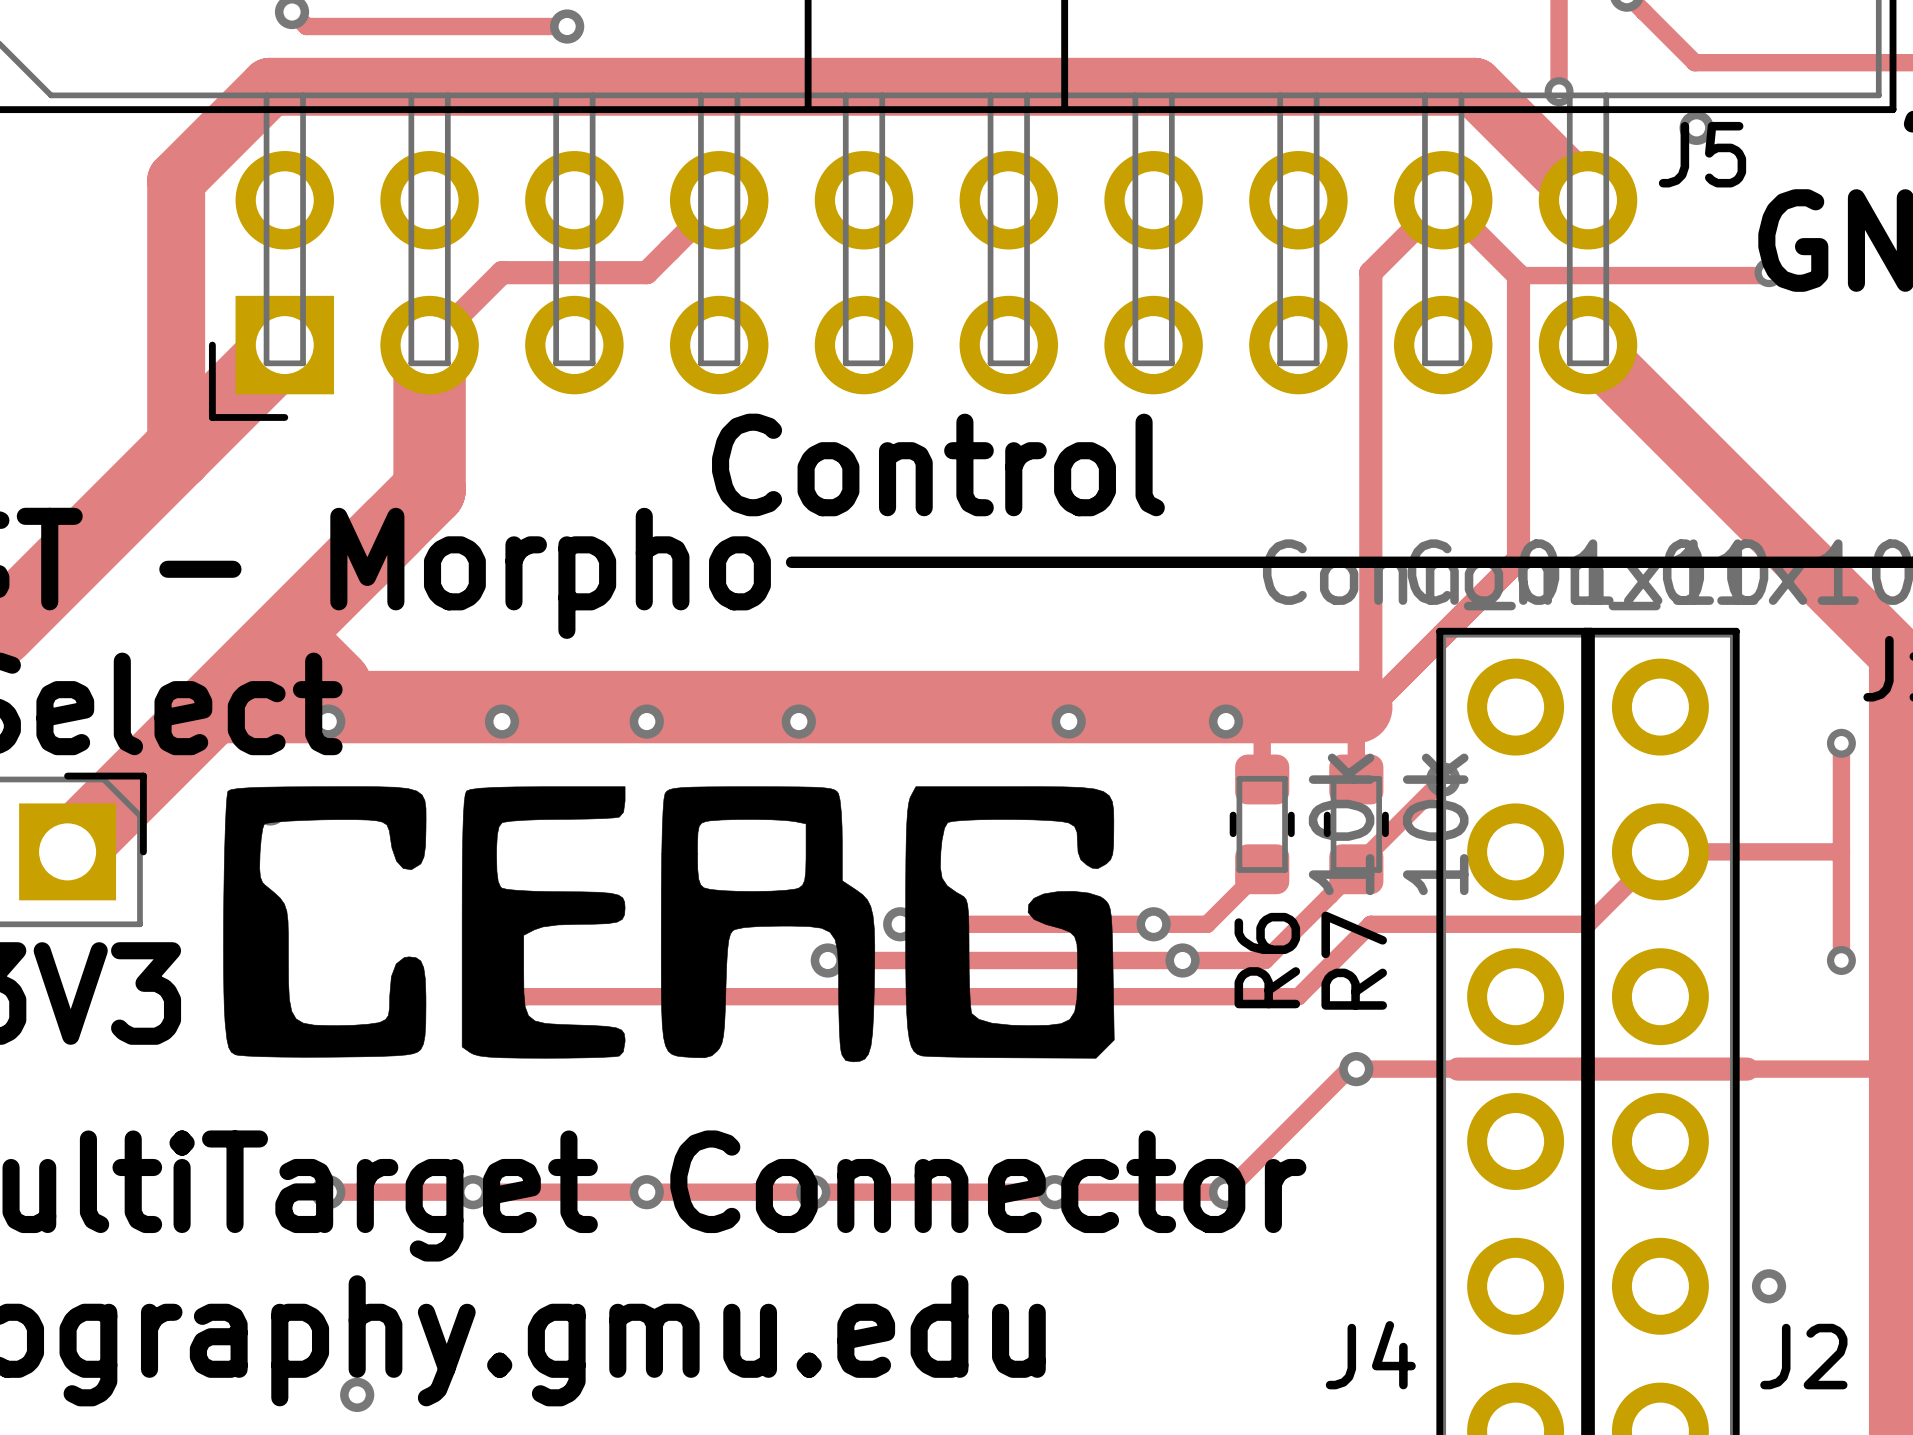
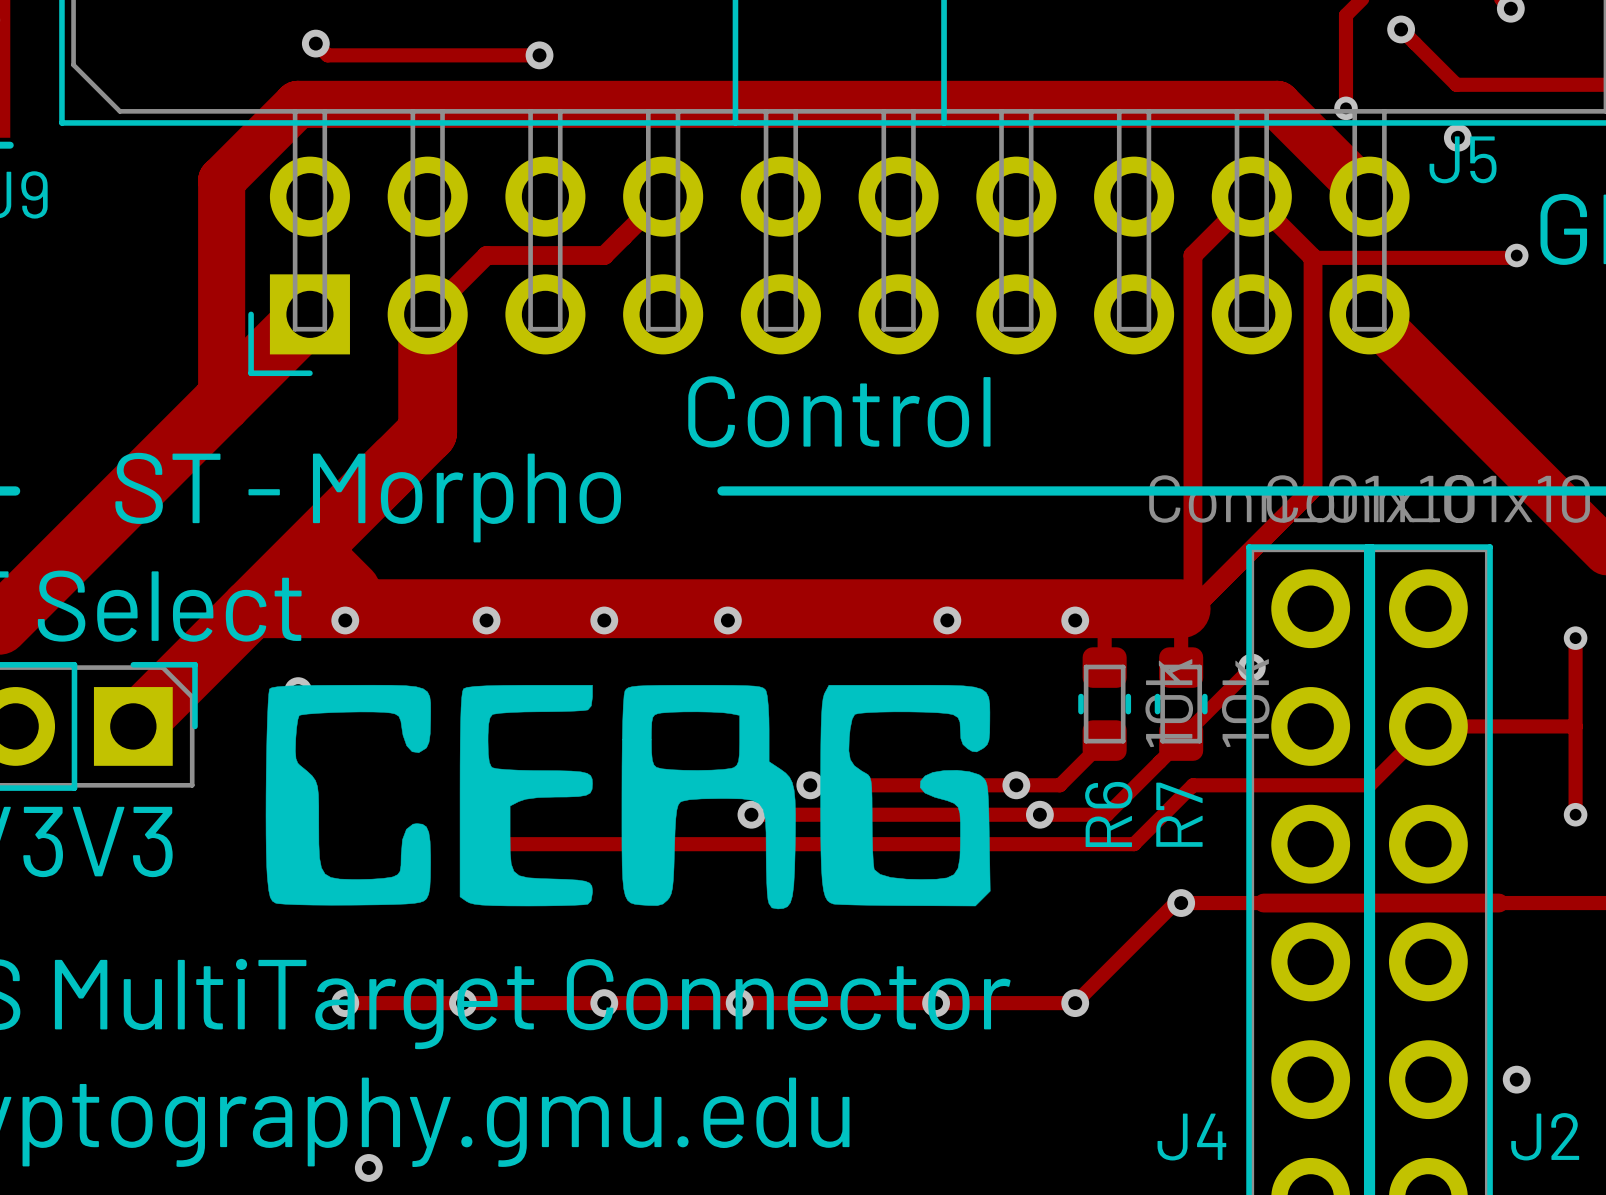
drawing position: (668, 924) -> (628, 797)

